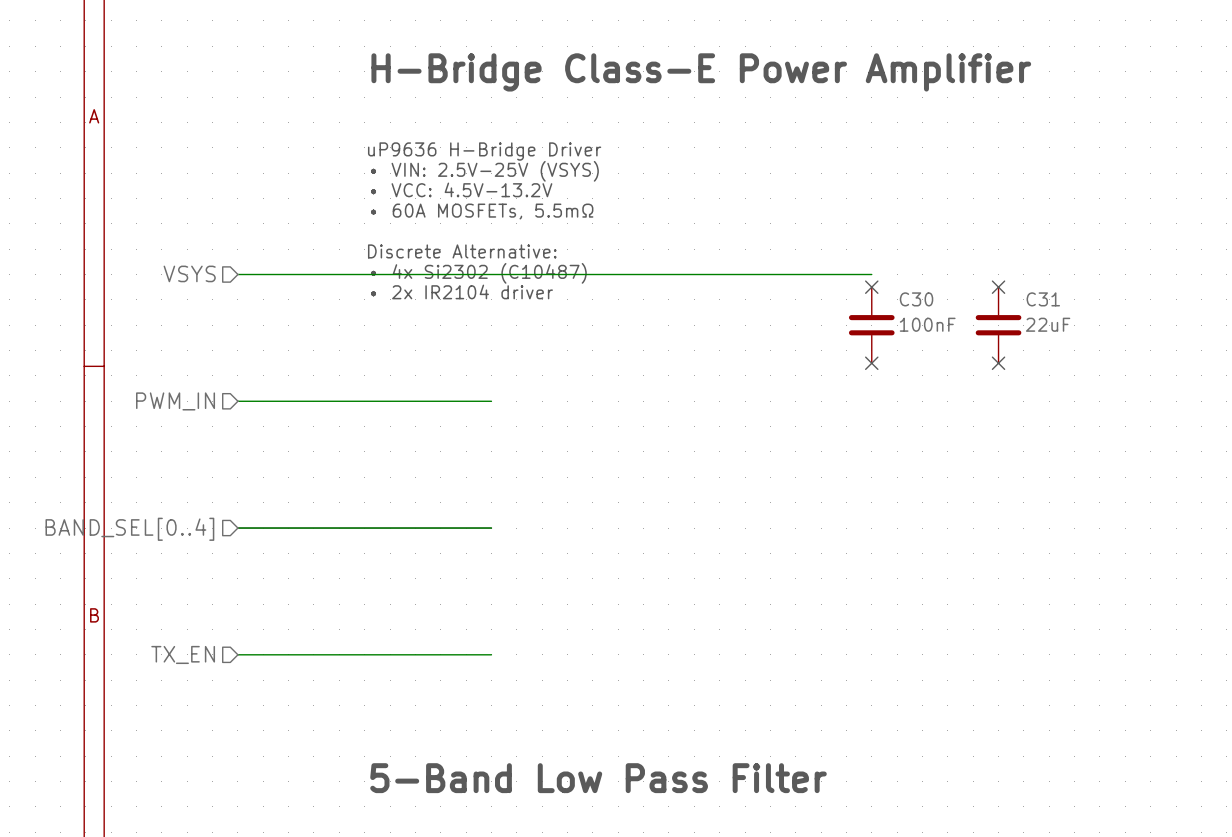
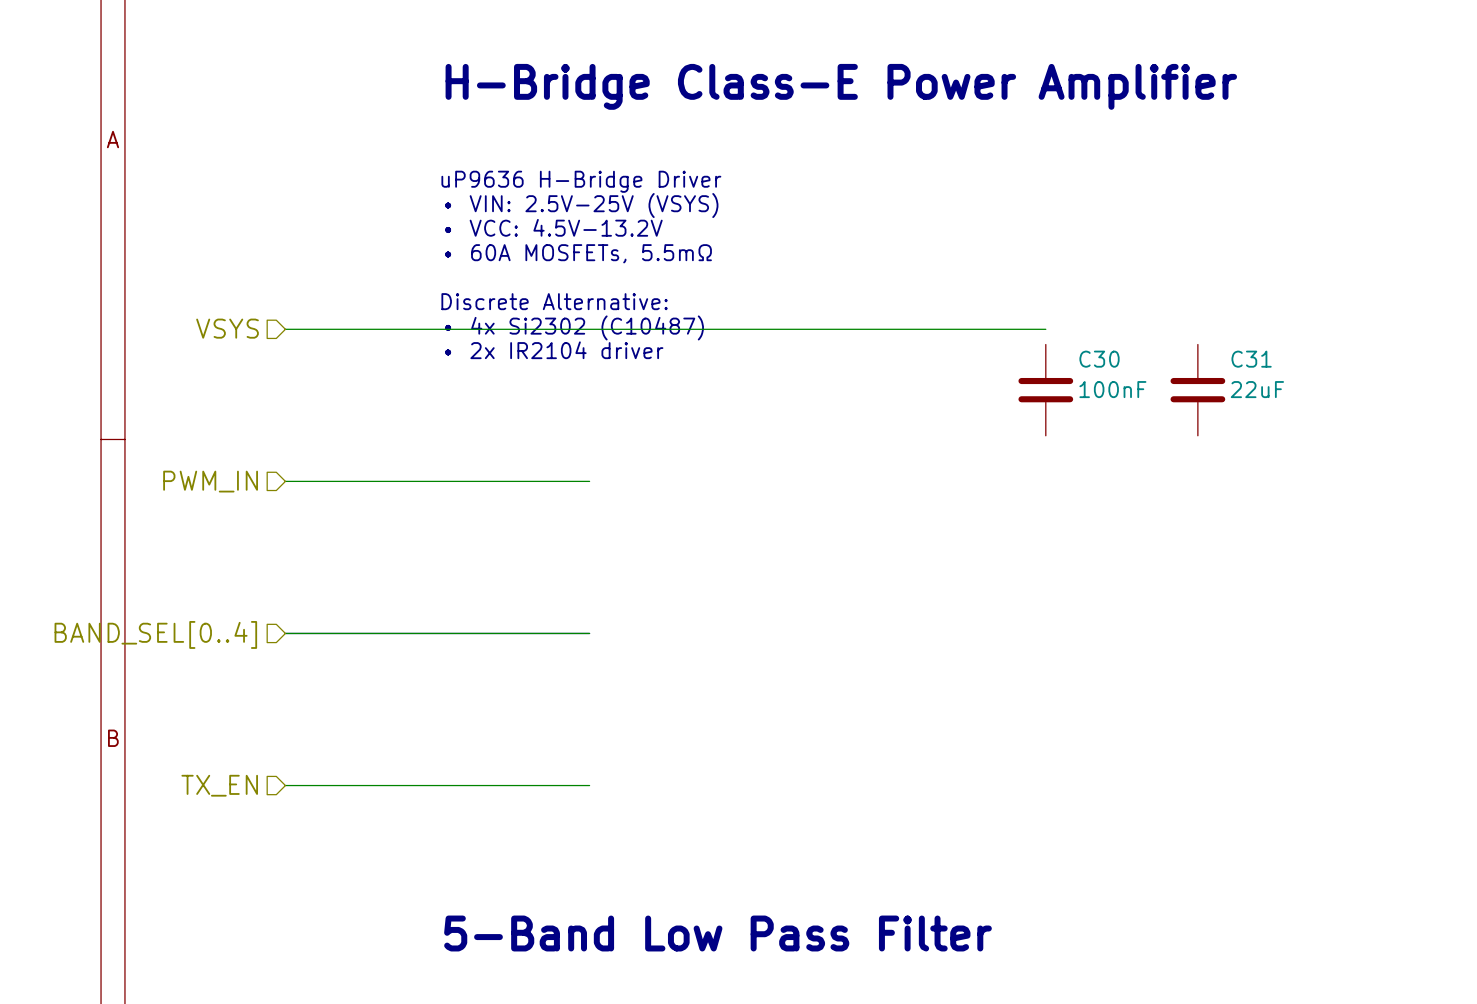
no-connect mark: (871, 287) -> none
no-connect mark: (998, 287) -> none
no-connect mark: (871, 363) -> none
no-connect mark: (998, 363) -> none

